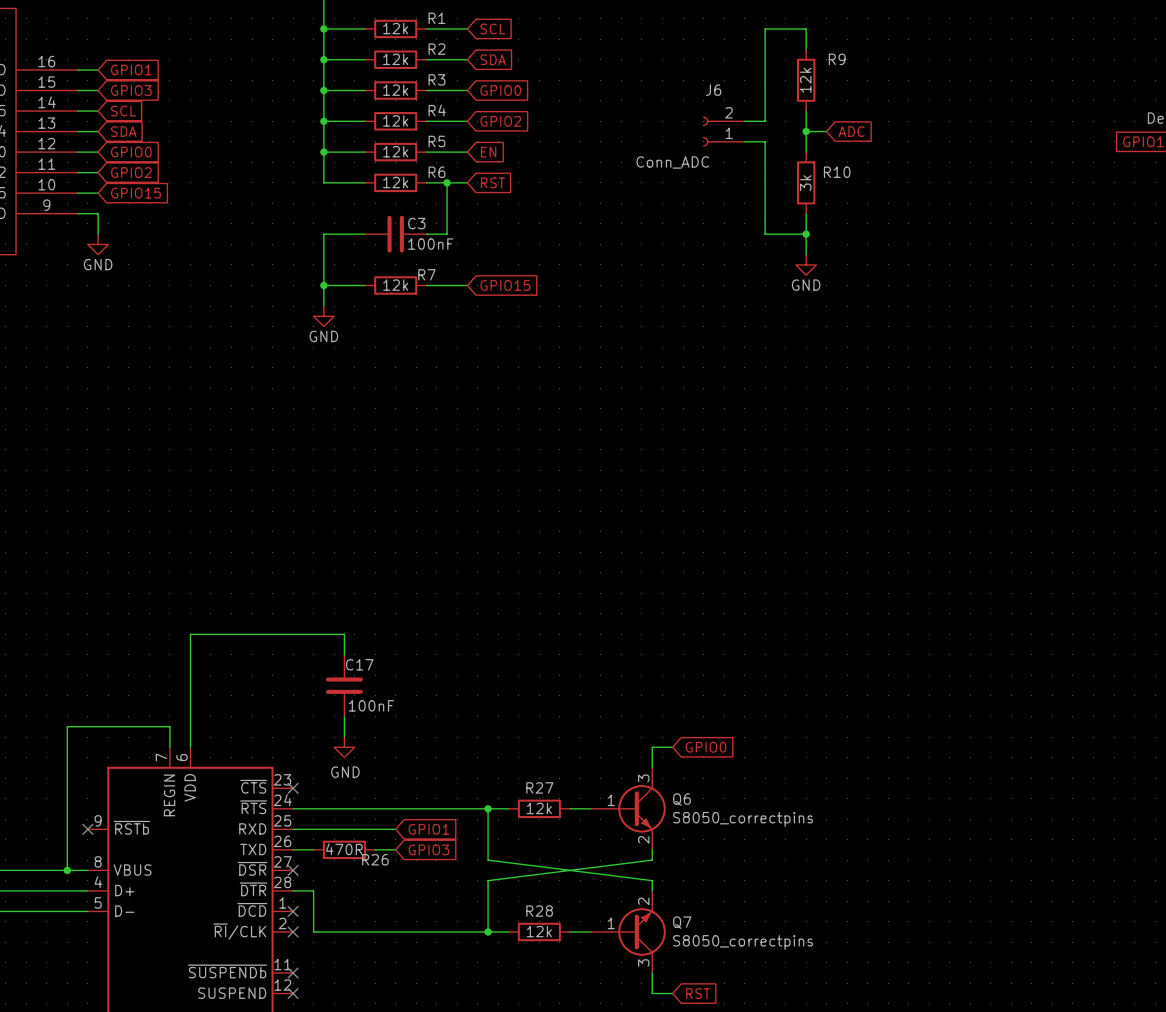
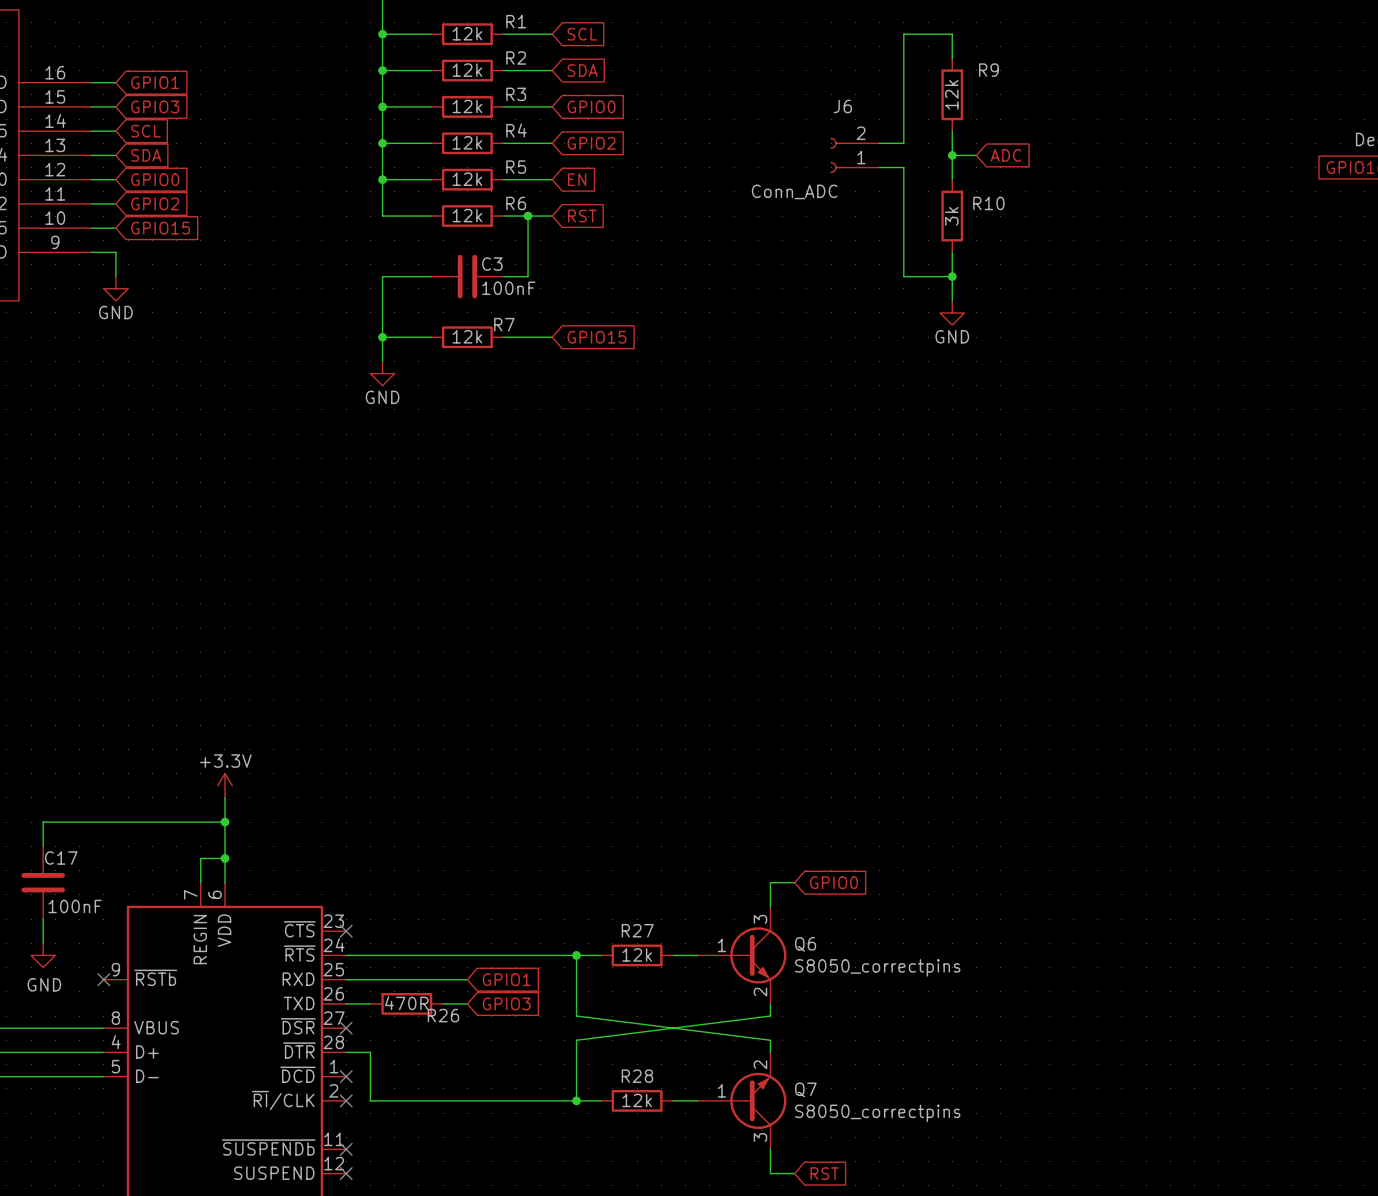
wire: (344, 654) (344, 634) (190, 634) (190, 675) -> none
power symbol: none -> +3.3V (224, 785)
C17 position: (344, 685) -> (43, 882)
wire: none -> (224, 822) (43, 822) (43, 846)
junction: none -> (224, 822)
wire: (344, 716) (344, 737) -> none
wire: (169, 726) (67, 726) (67, 870) -> (200, 858) (224, 858)
junction: none -> (224, 858)
power symbol: GND (344, 747) -> none
wire: none -> (43, 919) (43, 943)
power symbol: none -> GND (43, 955)
junction: (67, 870) -> none

